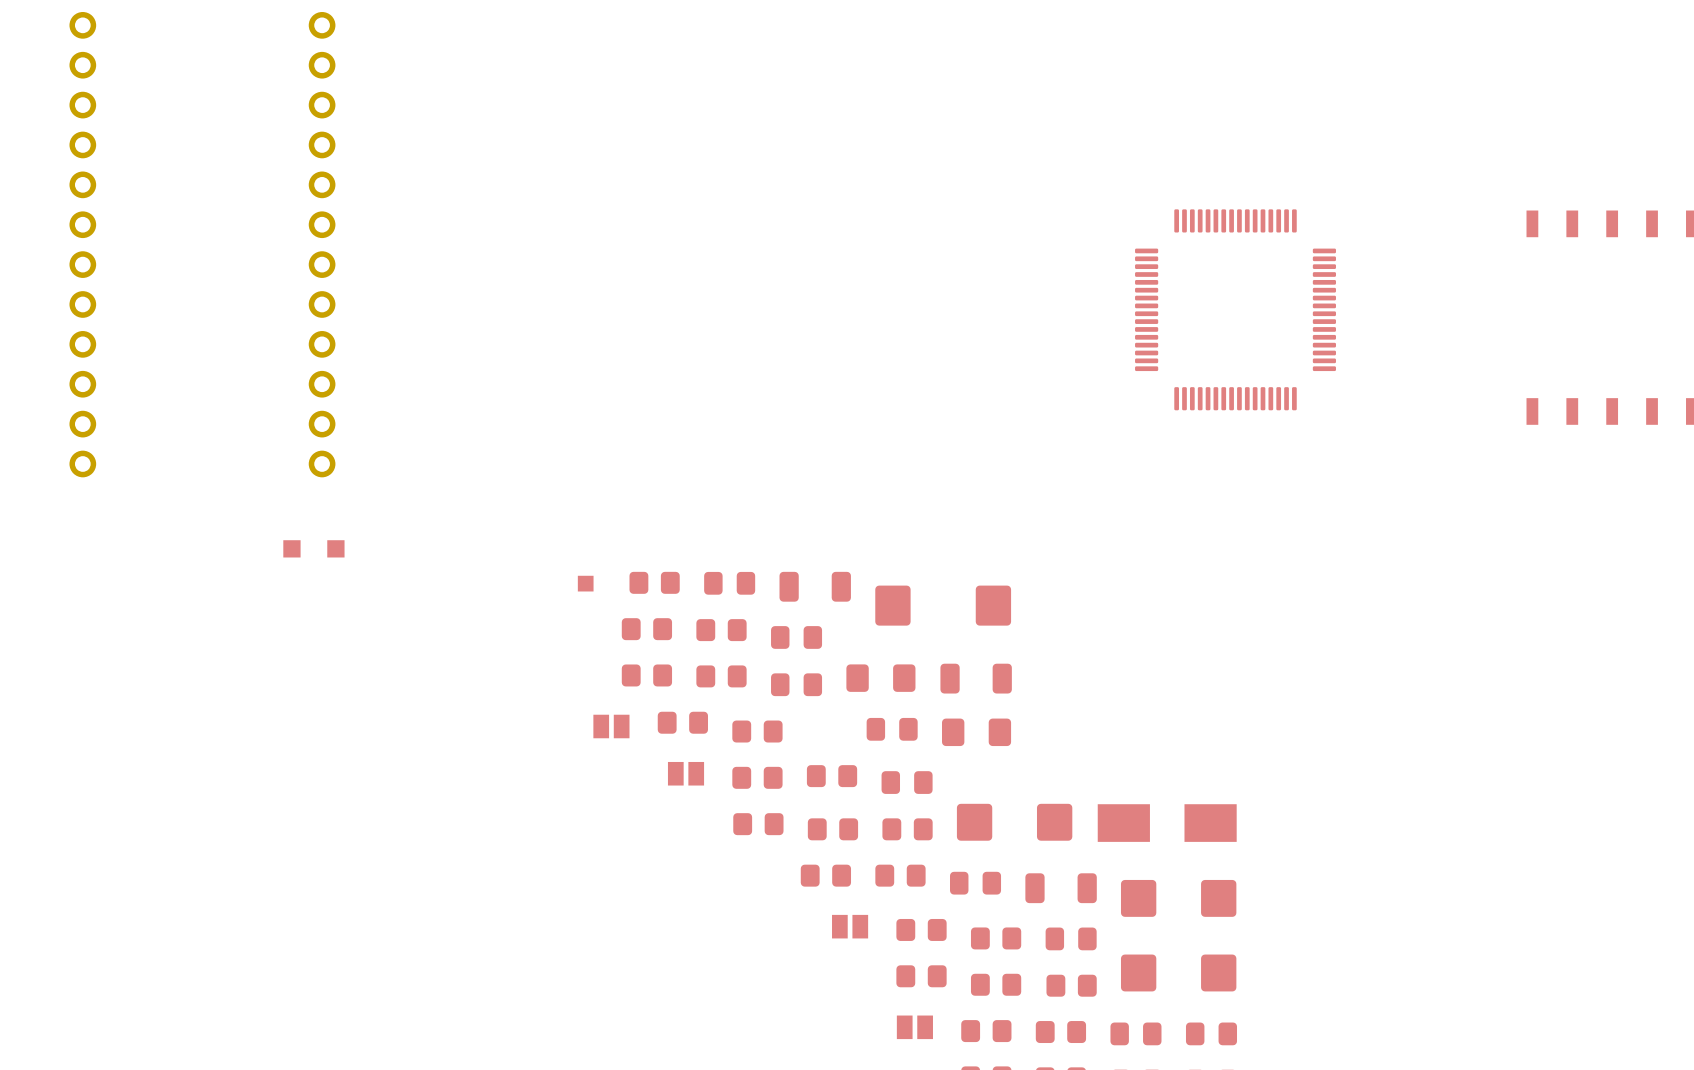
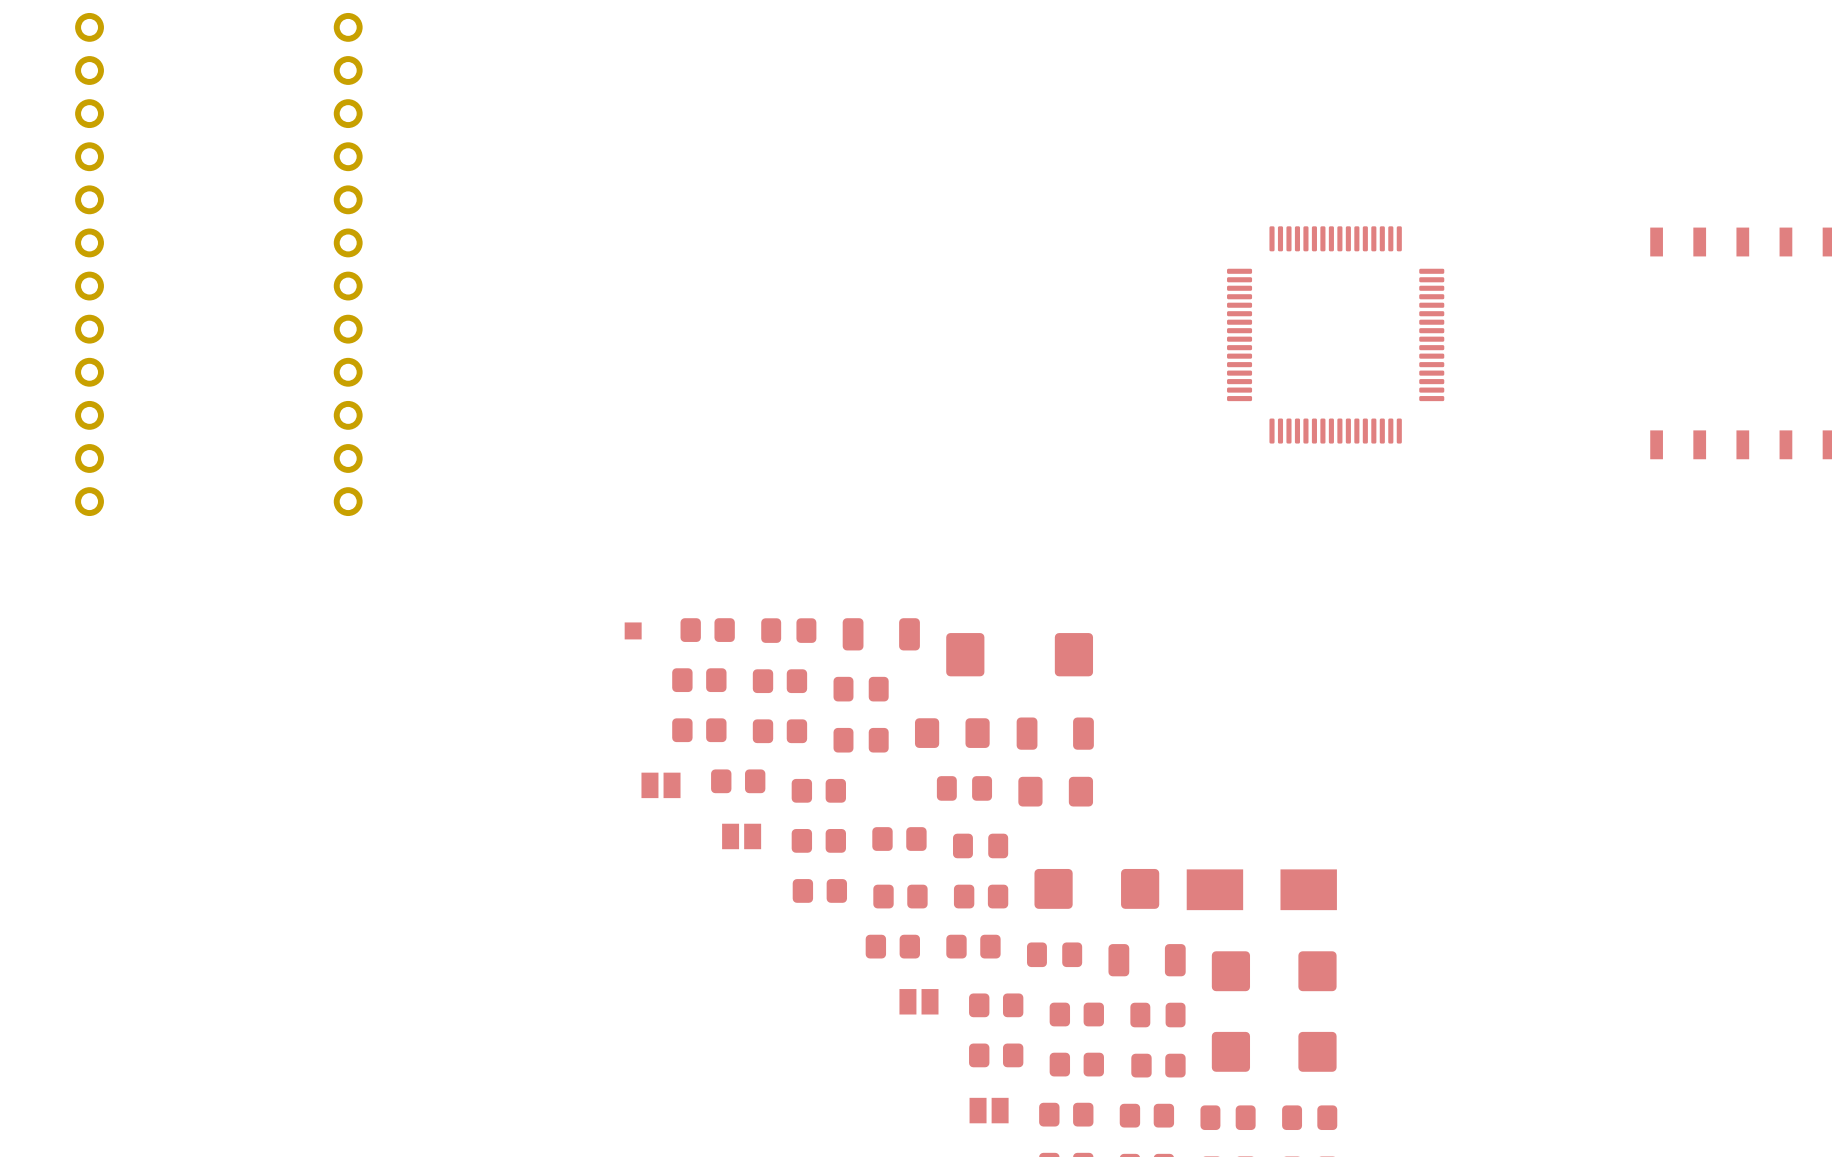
part: (313, 548) -> none

